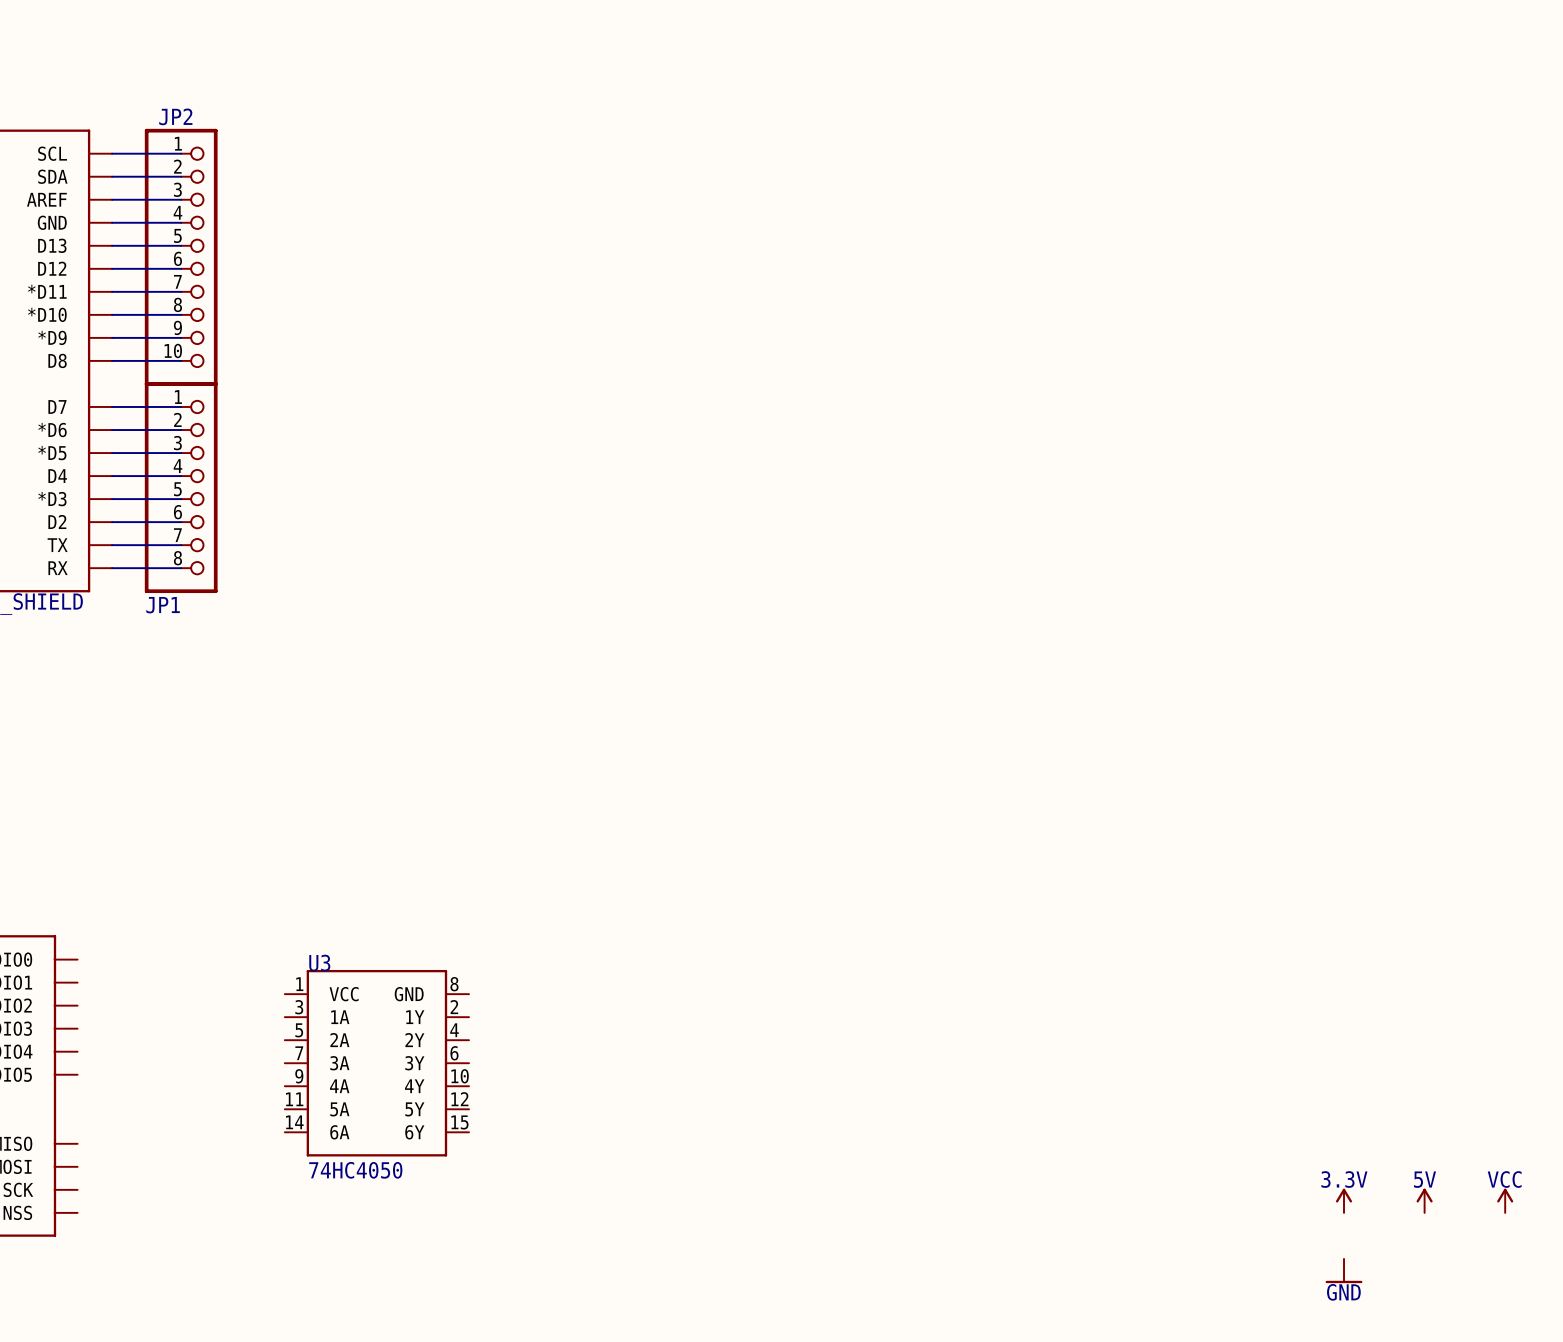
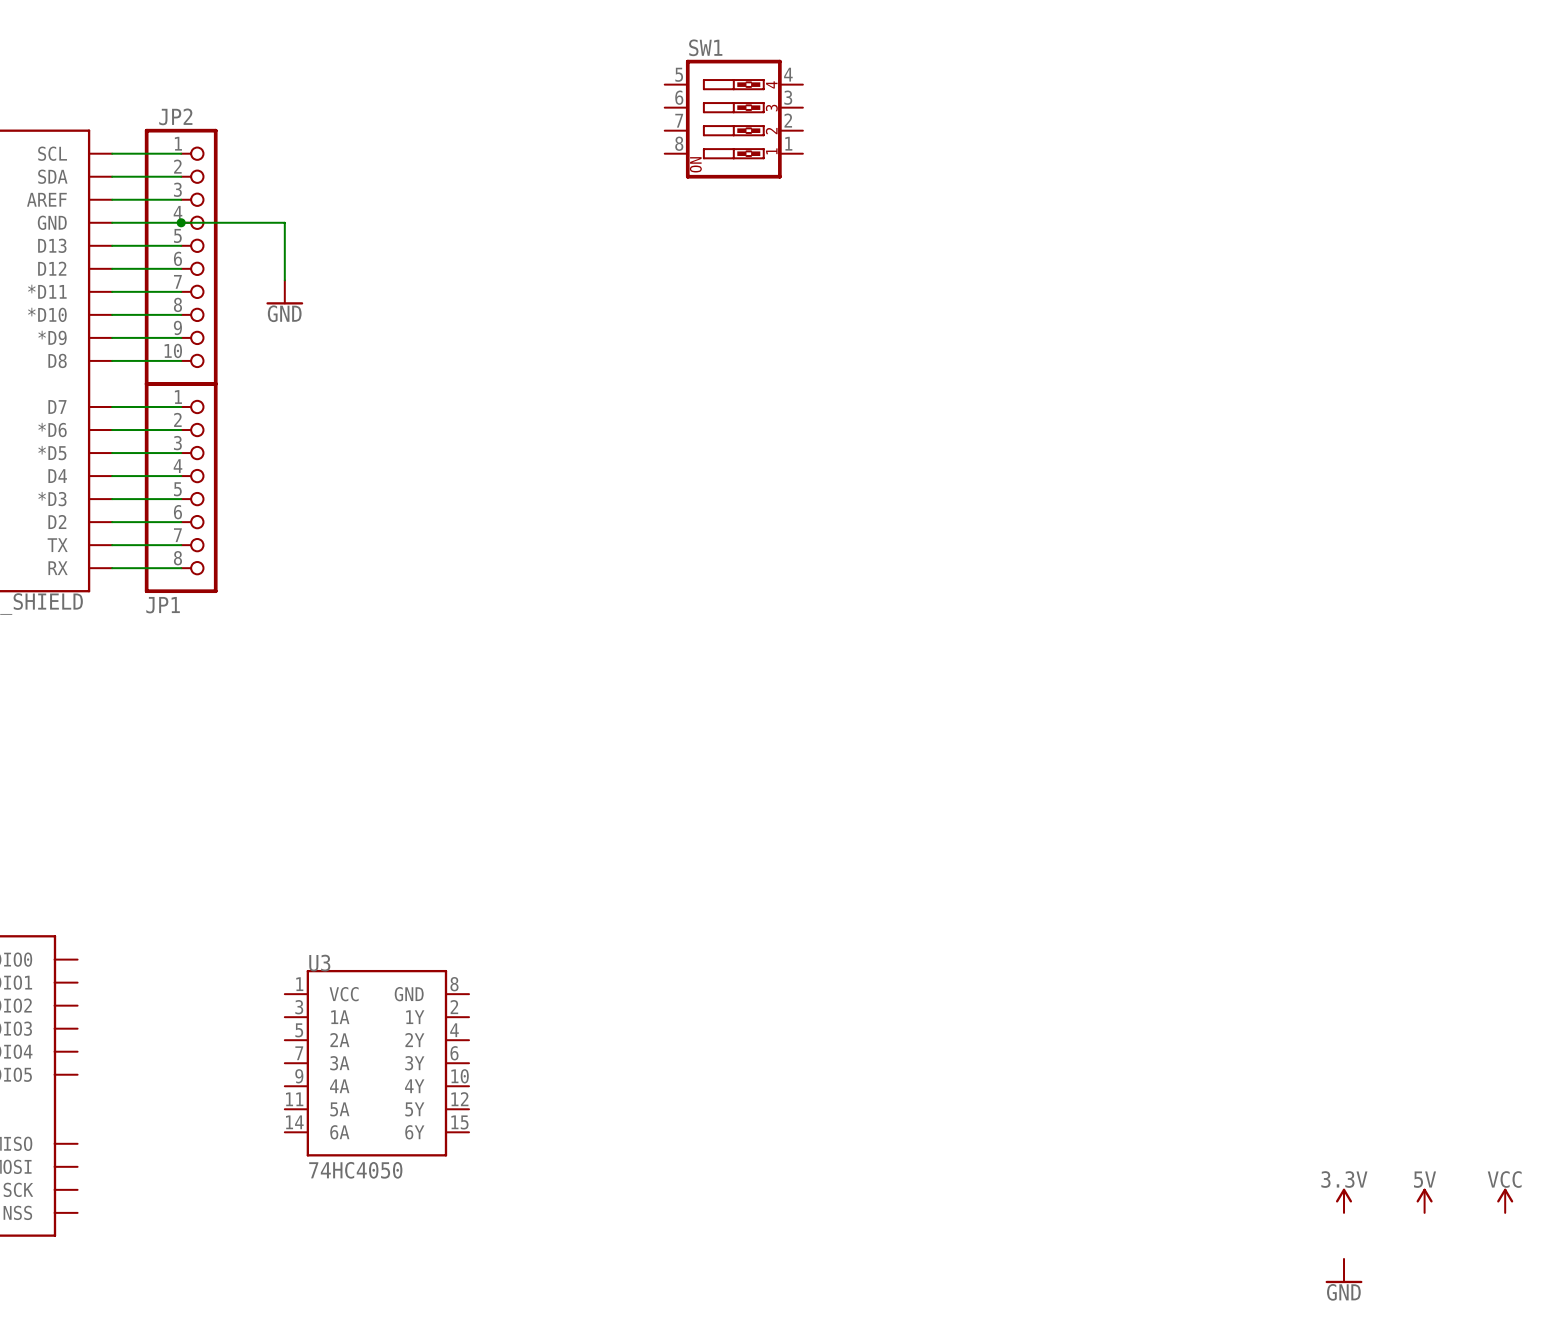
SW1: none -> (733, 119)
wire: none -> (181, 222) (284, 222) (284, 280)
junction: none -> (181, 222)
power symbol: none -> GND (284, 292)

